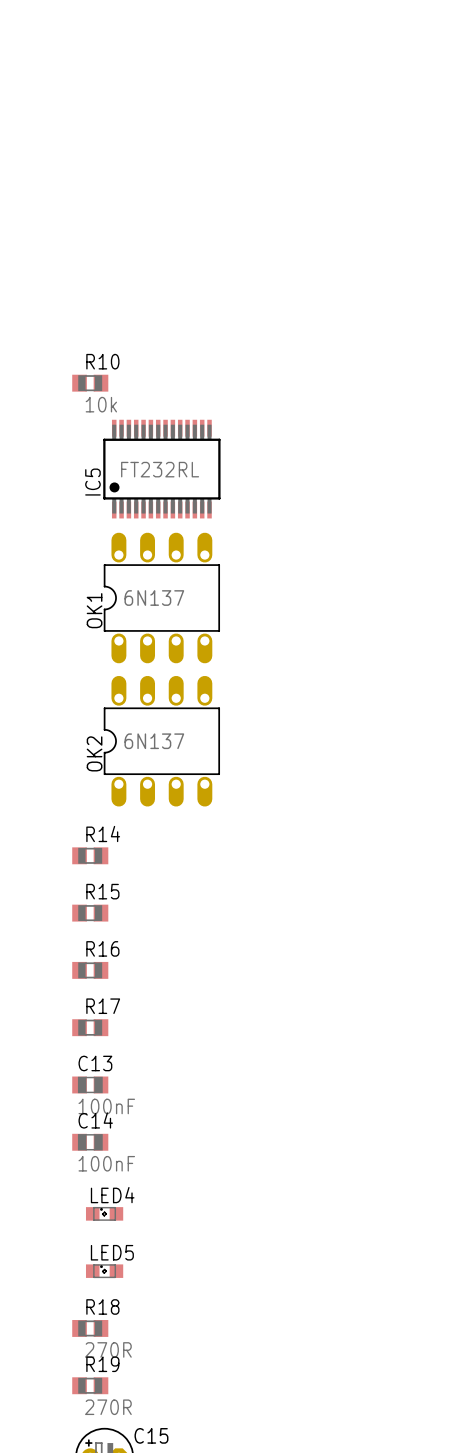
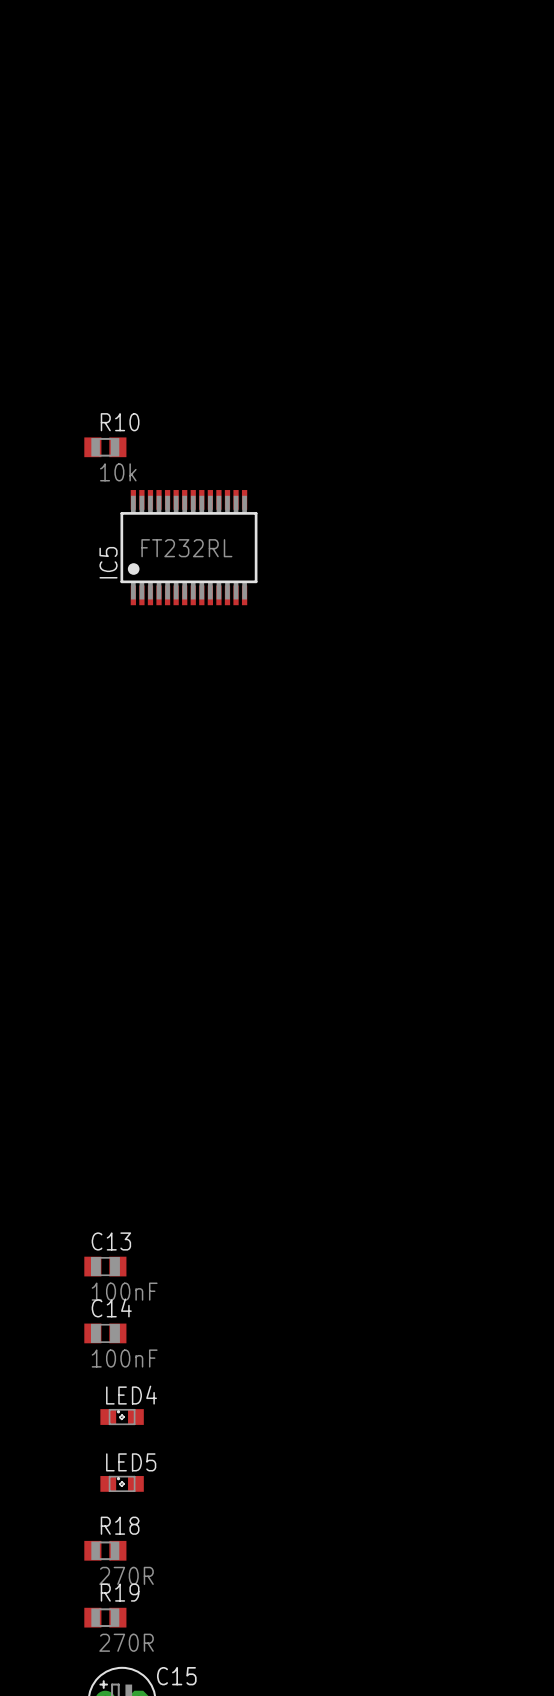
OK1: 6N137 (161, 598) -> none
OK2: 6N137 (161, 741) -> none
R14: (90, 855) -> none
R15: (90, 913) -> none
R16: (90, 970) -> none
R17: (90, 1027) -> none

